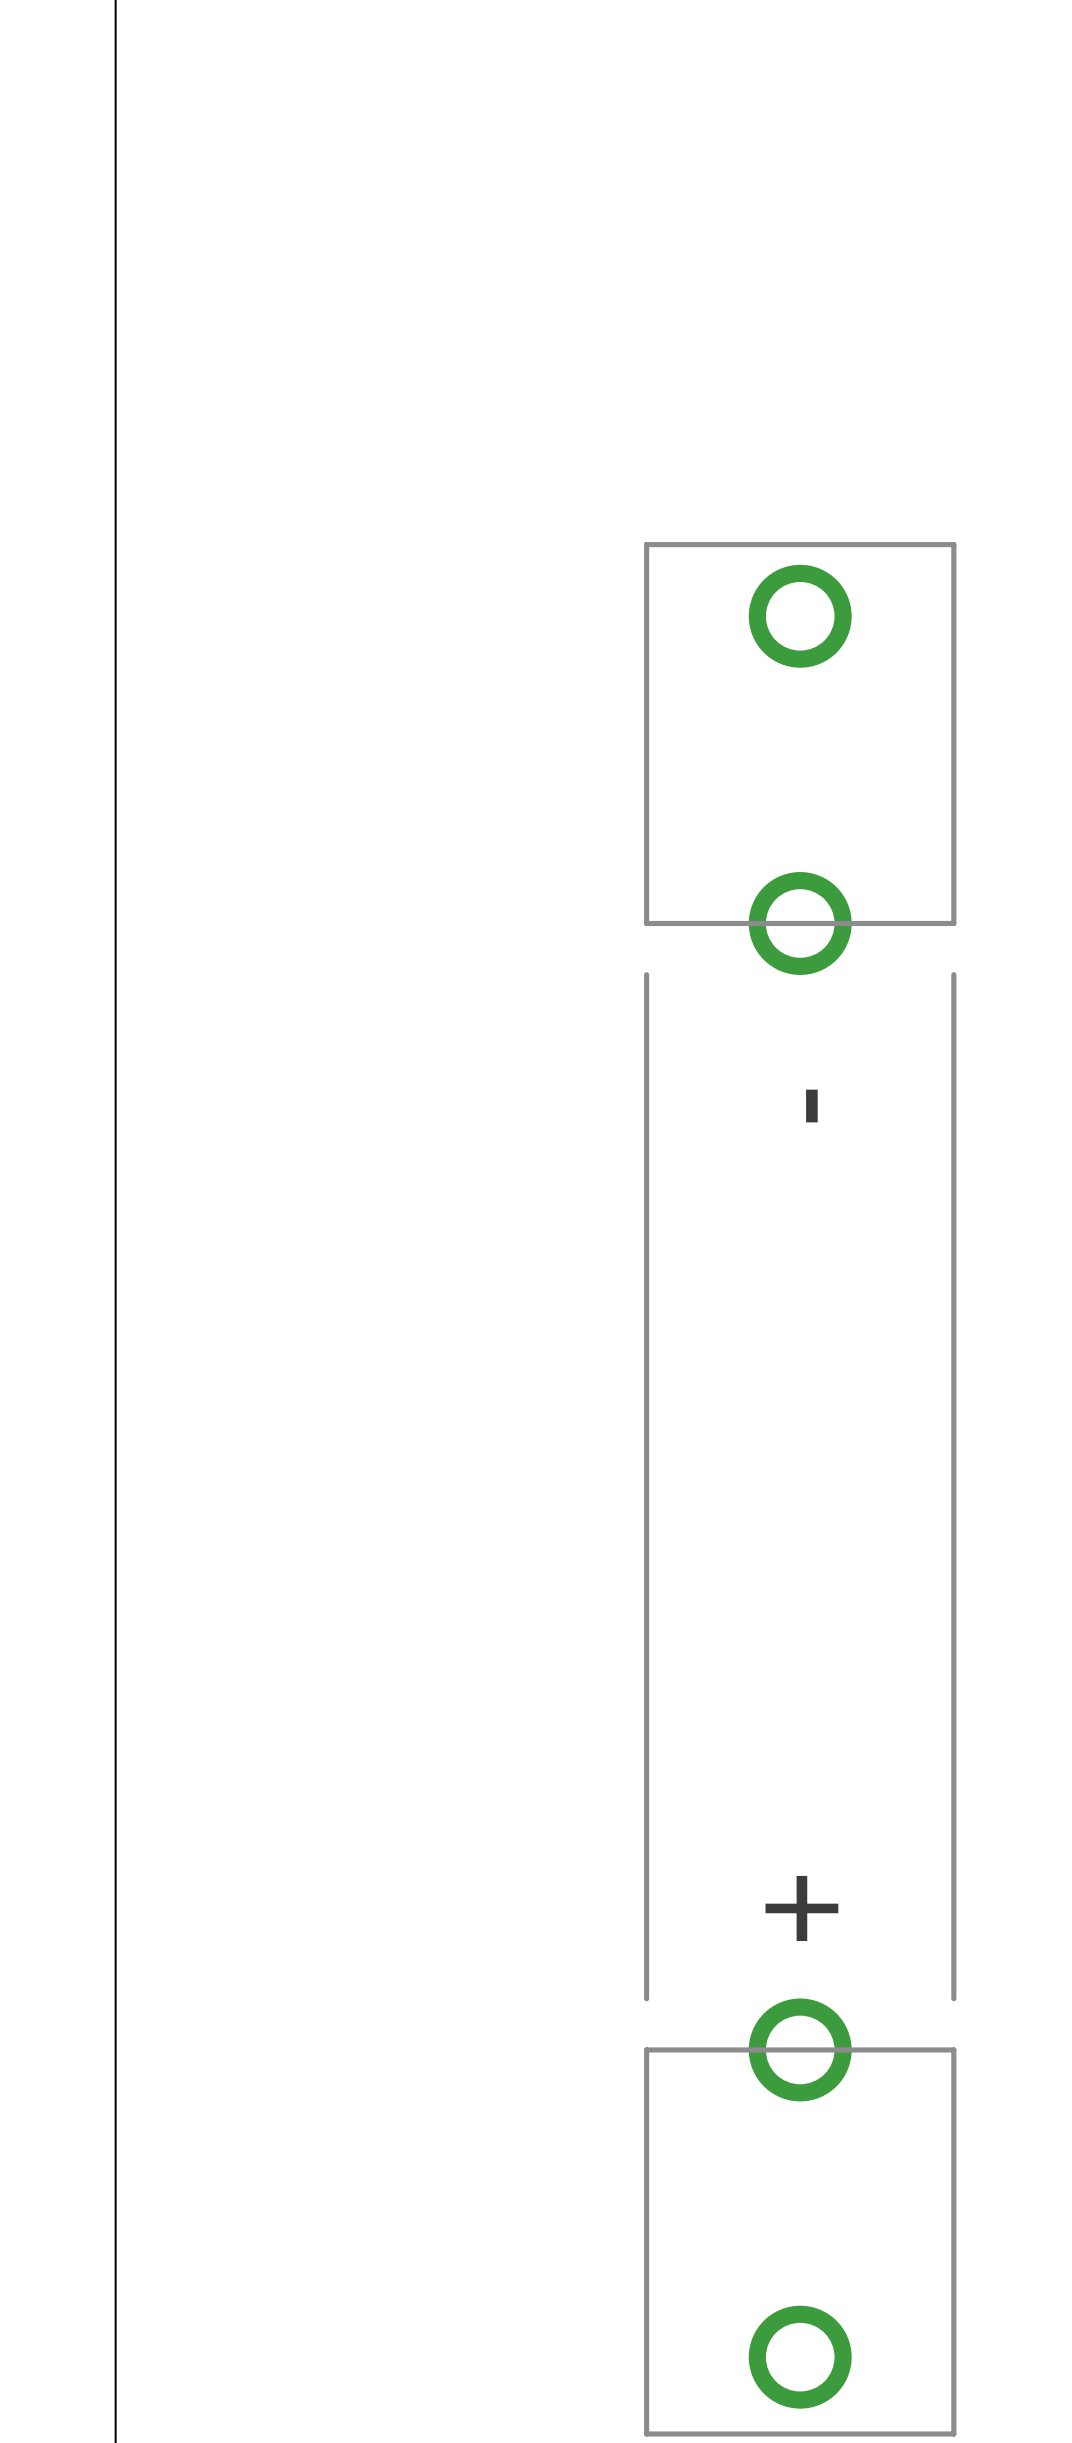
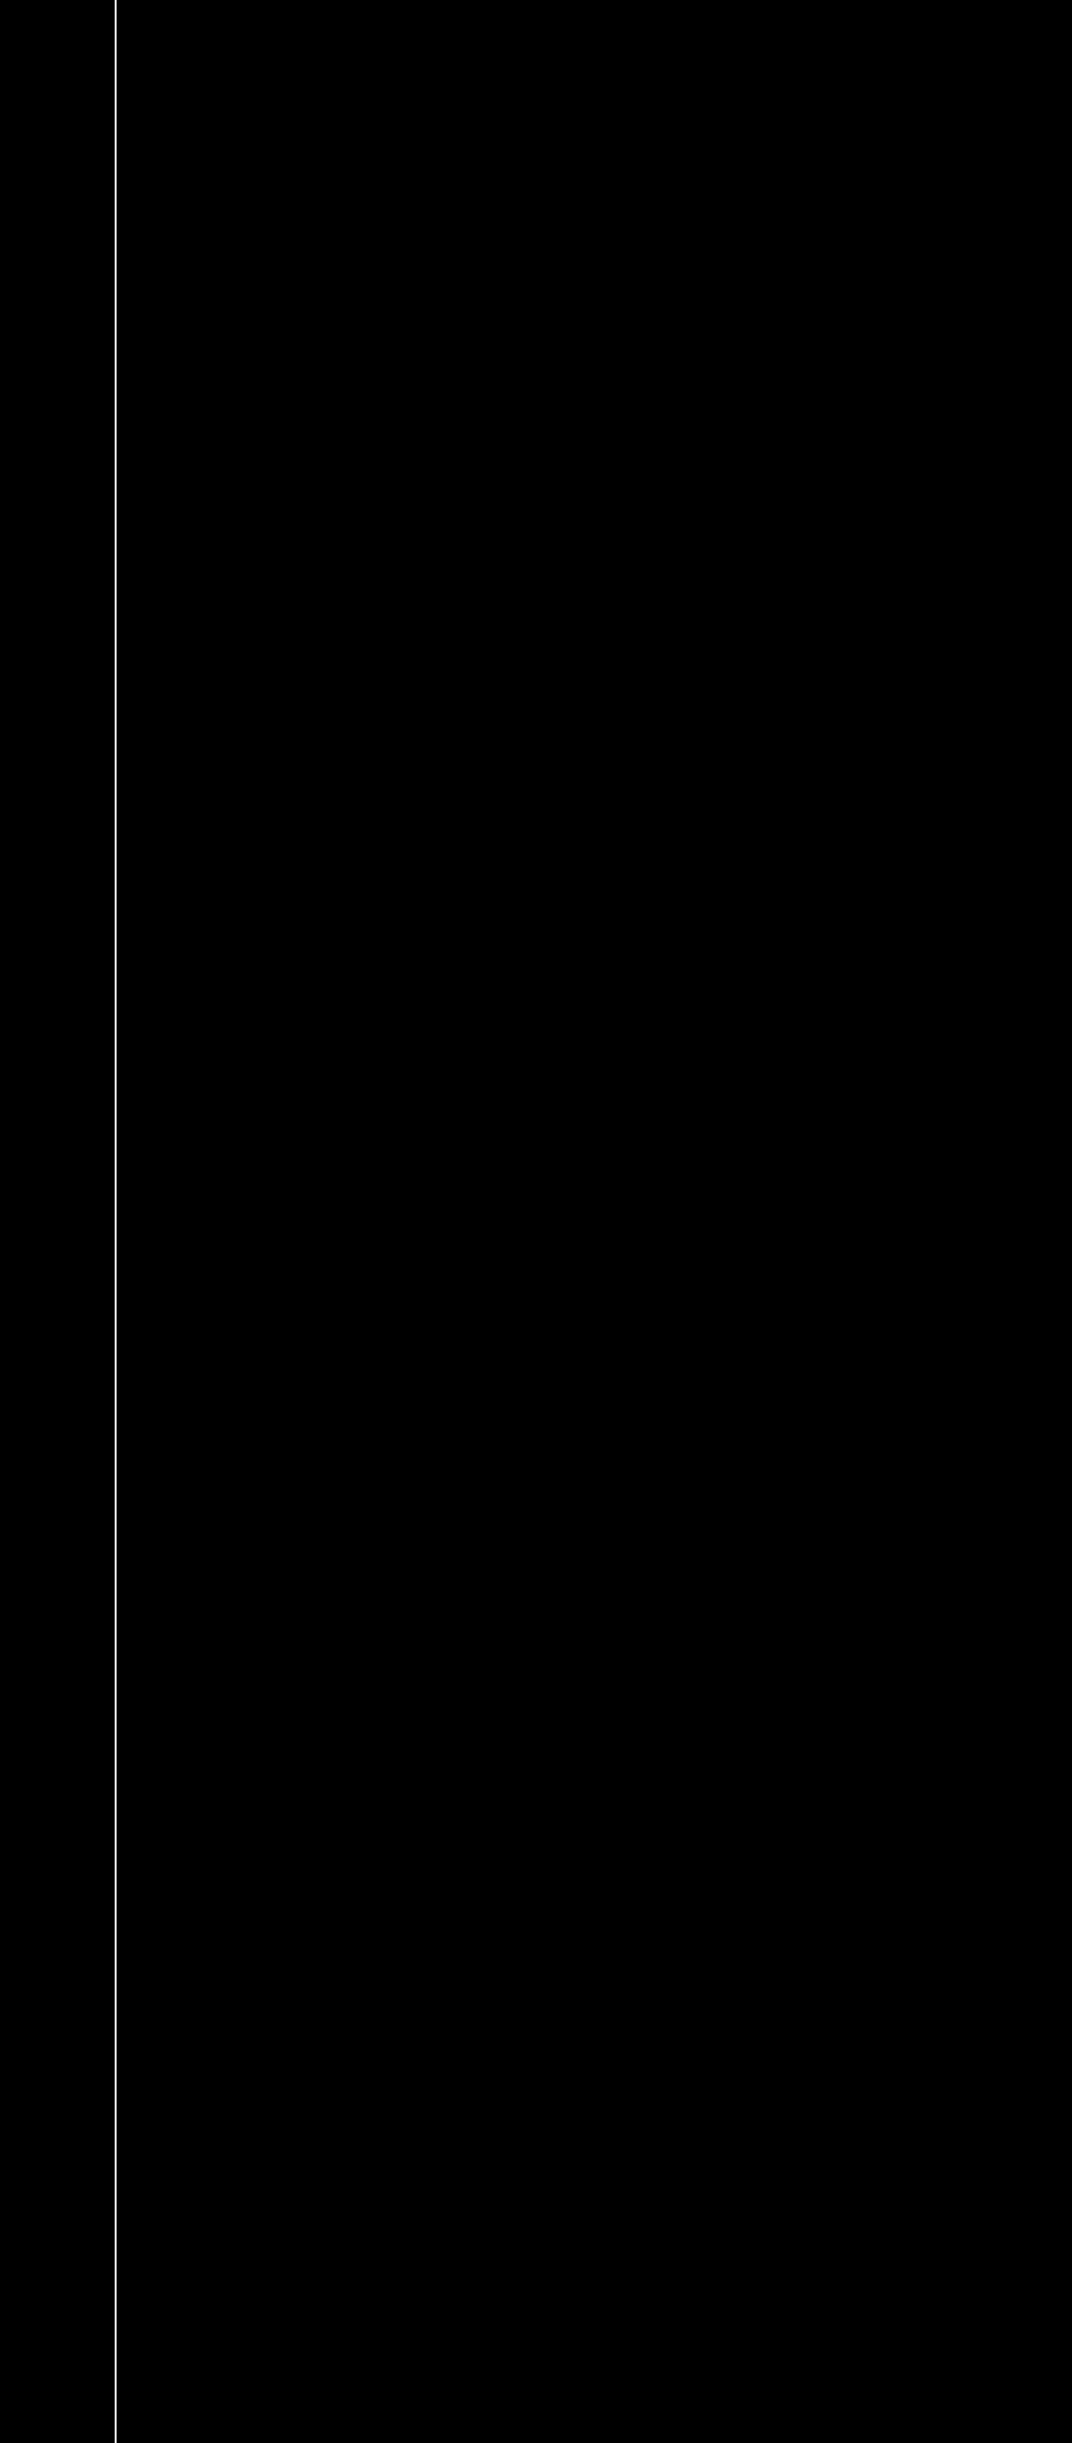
part: (800, 1489) -> none

